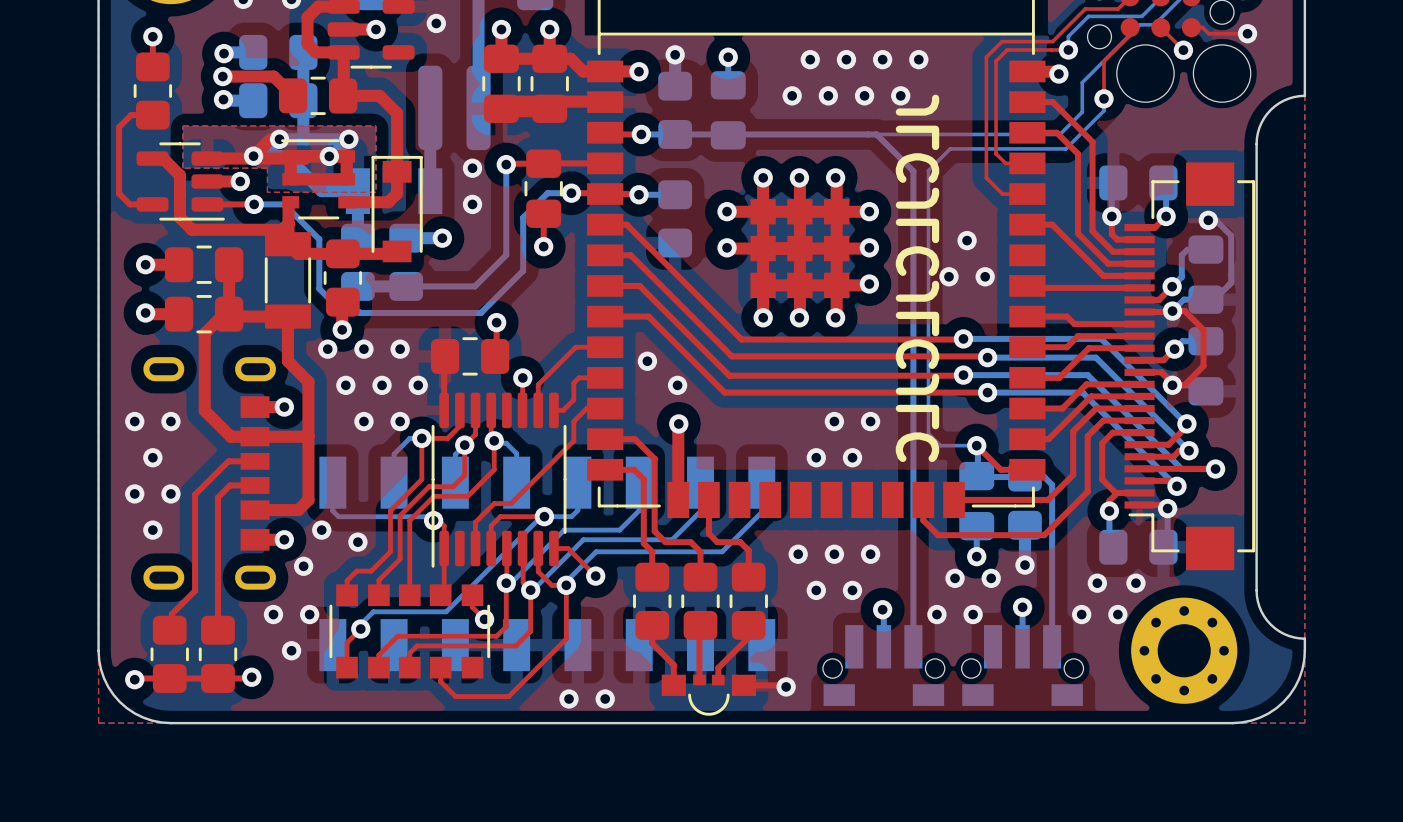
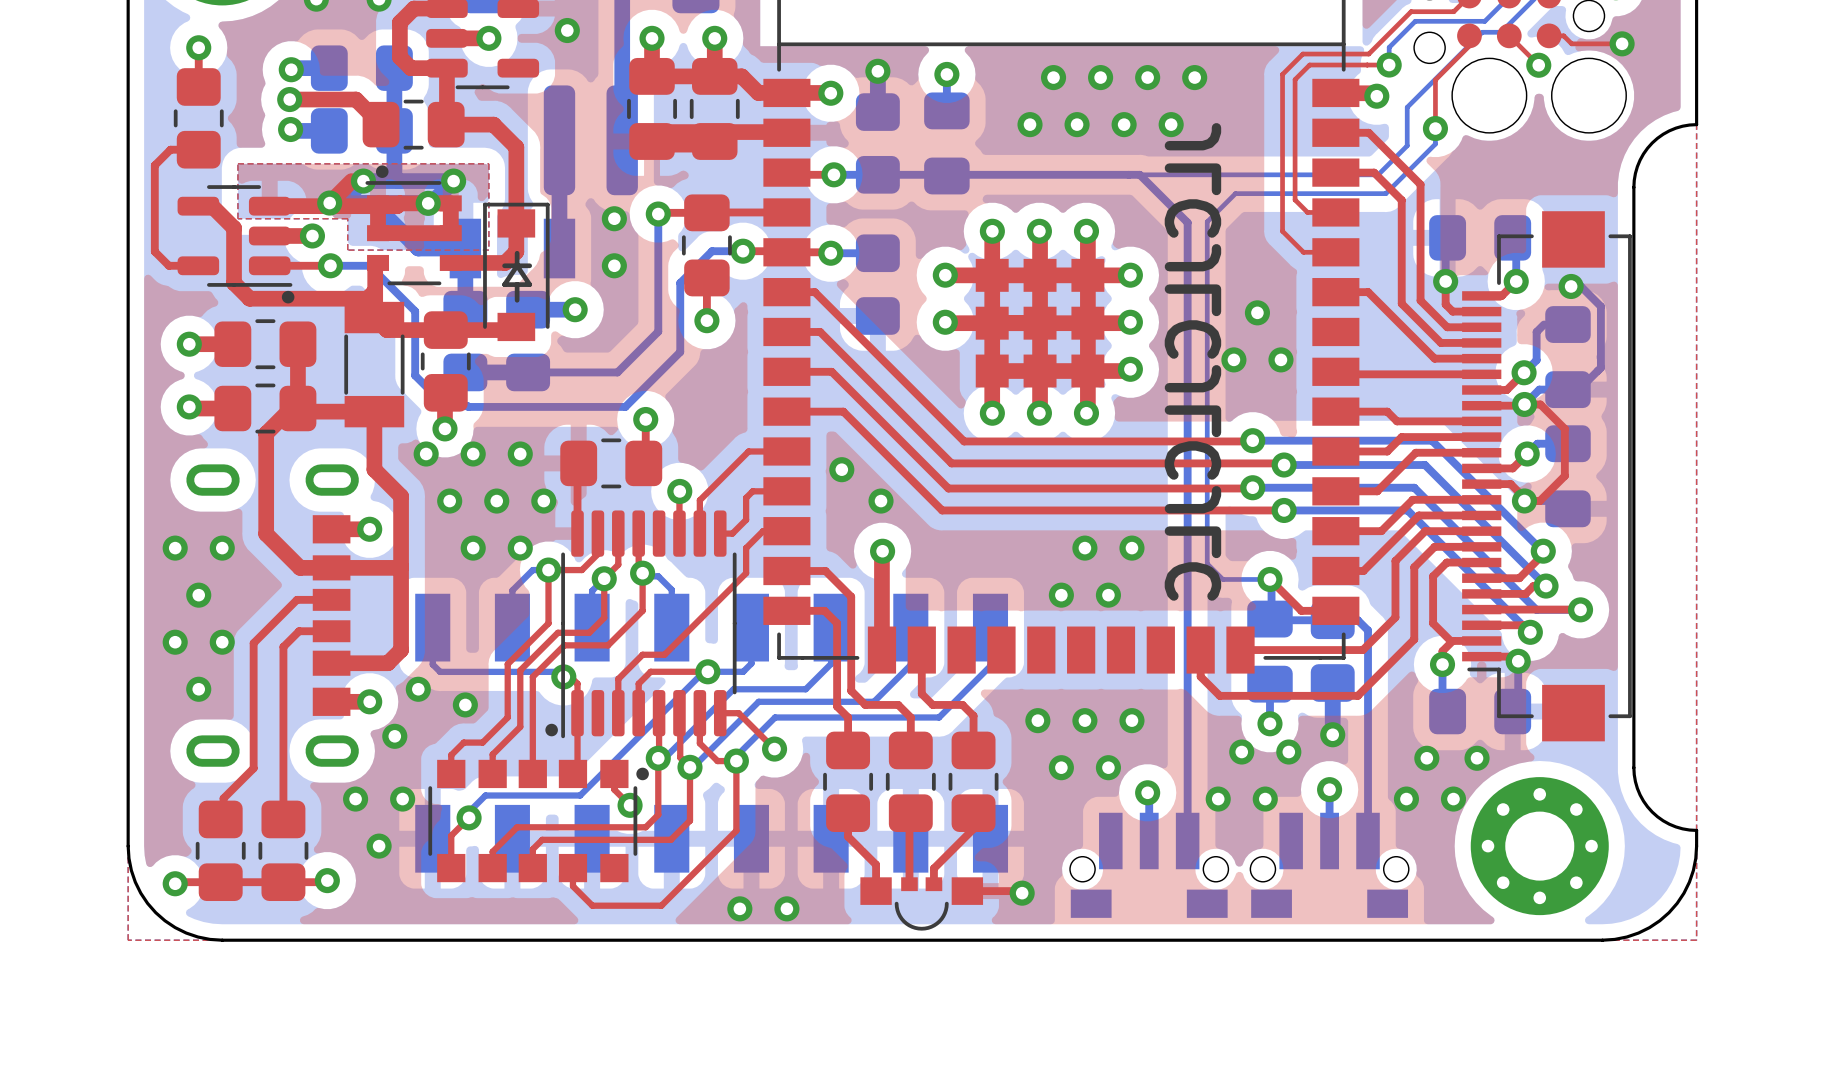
drawing: none -> [375, 165, 389, 178]
line: none -> (517, 253) (517, 265)
line: none -> (504, 265) (529, 265)
line: none -> (517, 265) (504, 284) (529, 284) (517, 265)
line: none -> (517, 284) (517, 300)
drawing: none -> [281, 290, 295, 304]
drawing: none -> [545, 723, 558, 737]
drawing: none -> [636, 767, 649, 781]

